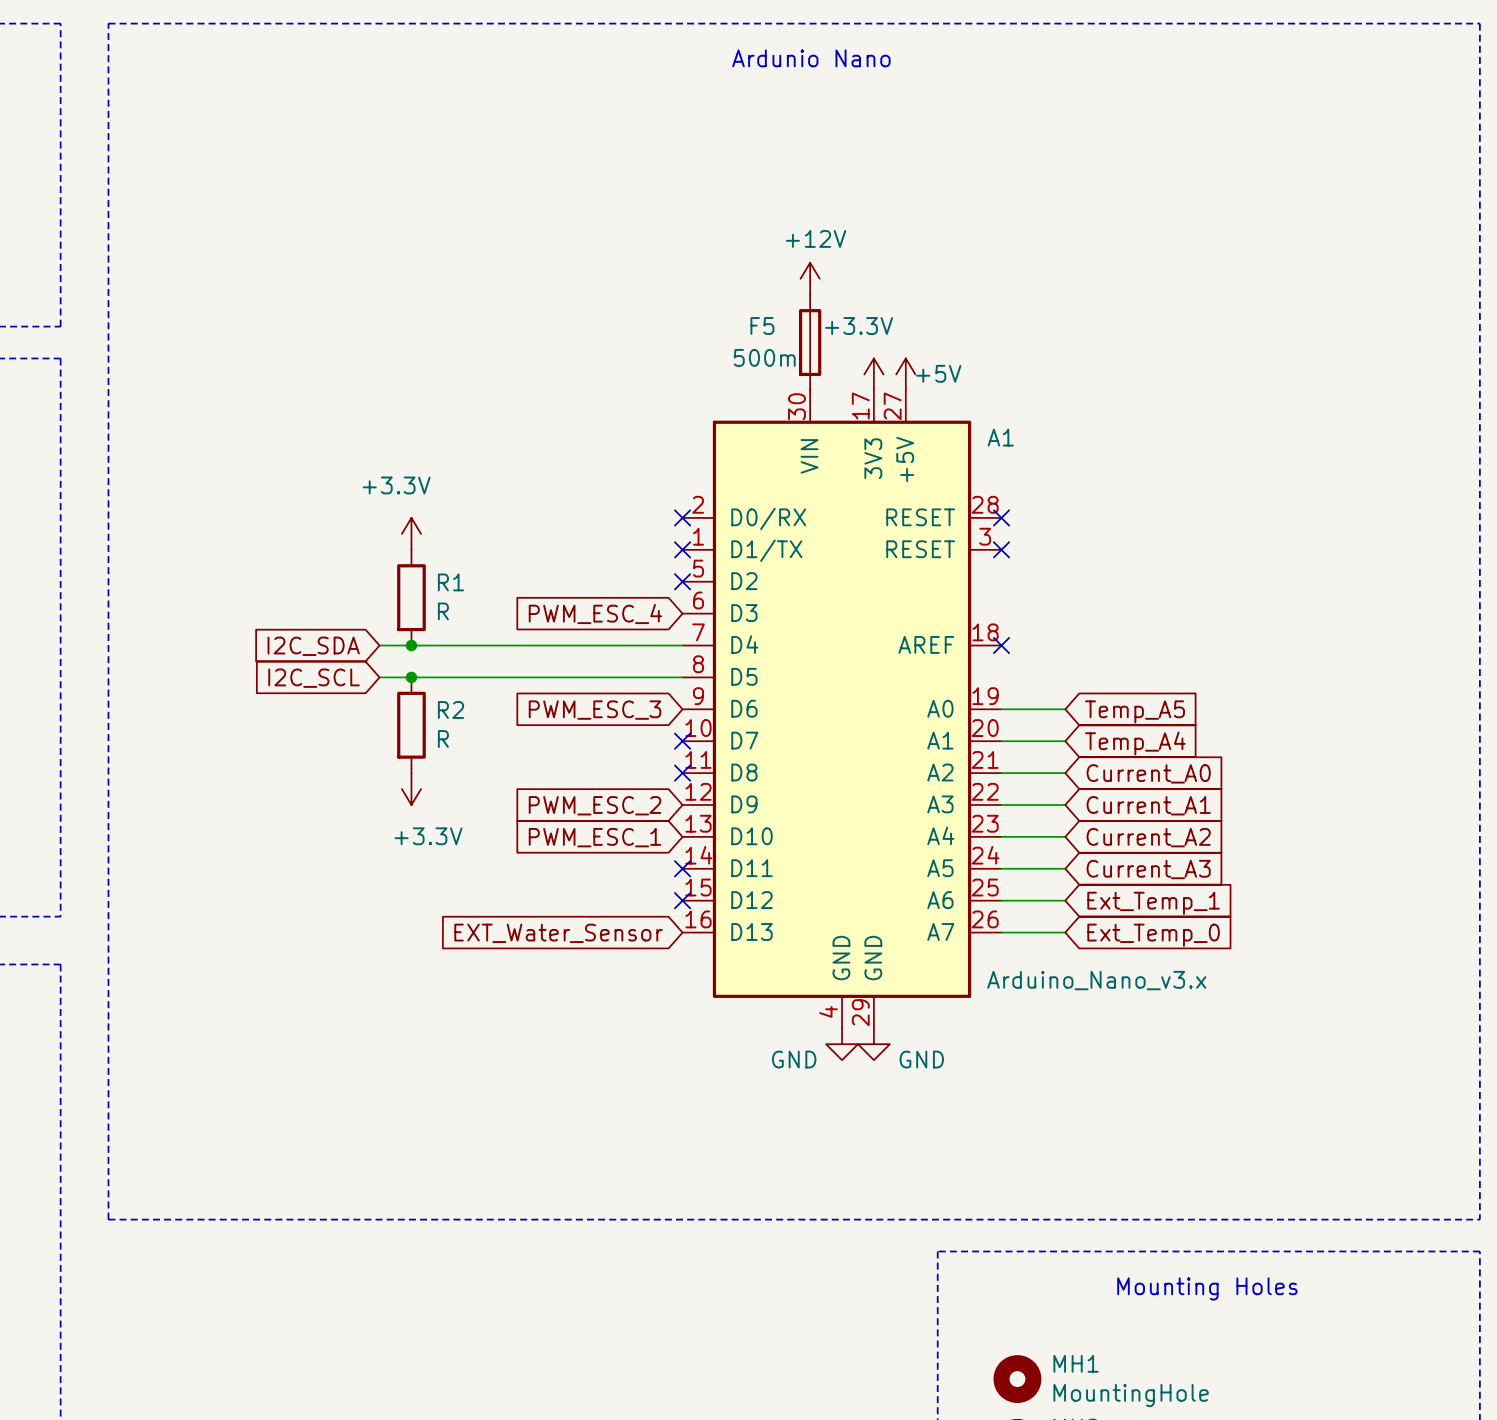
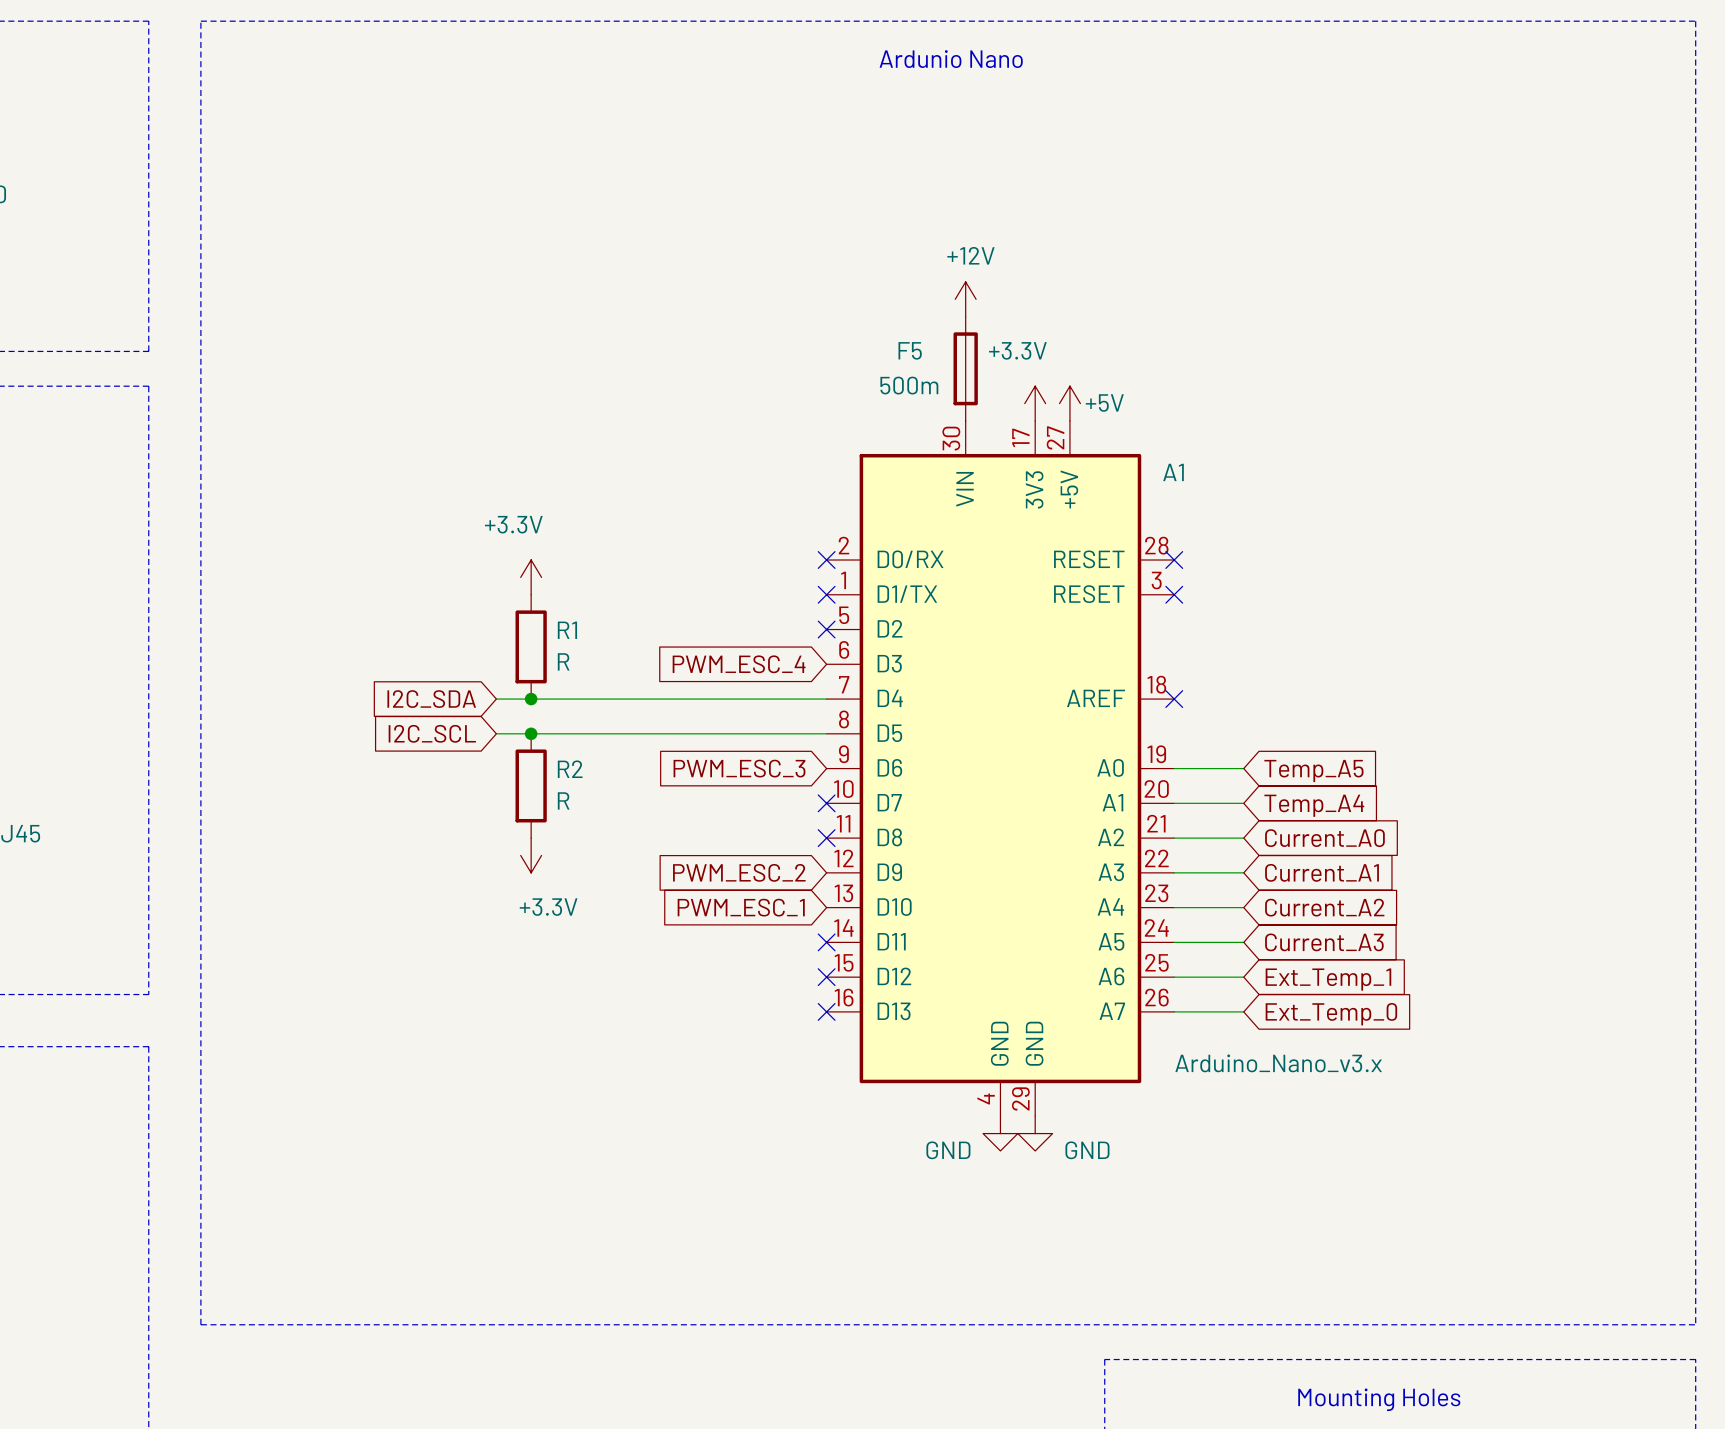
no-connect mark: none -> (826, 1011)
global label: EXT_Water_Sensor (558, 933) -> none

